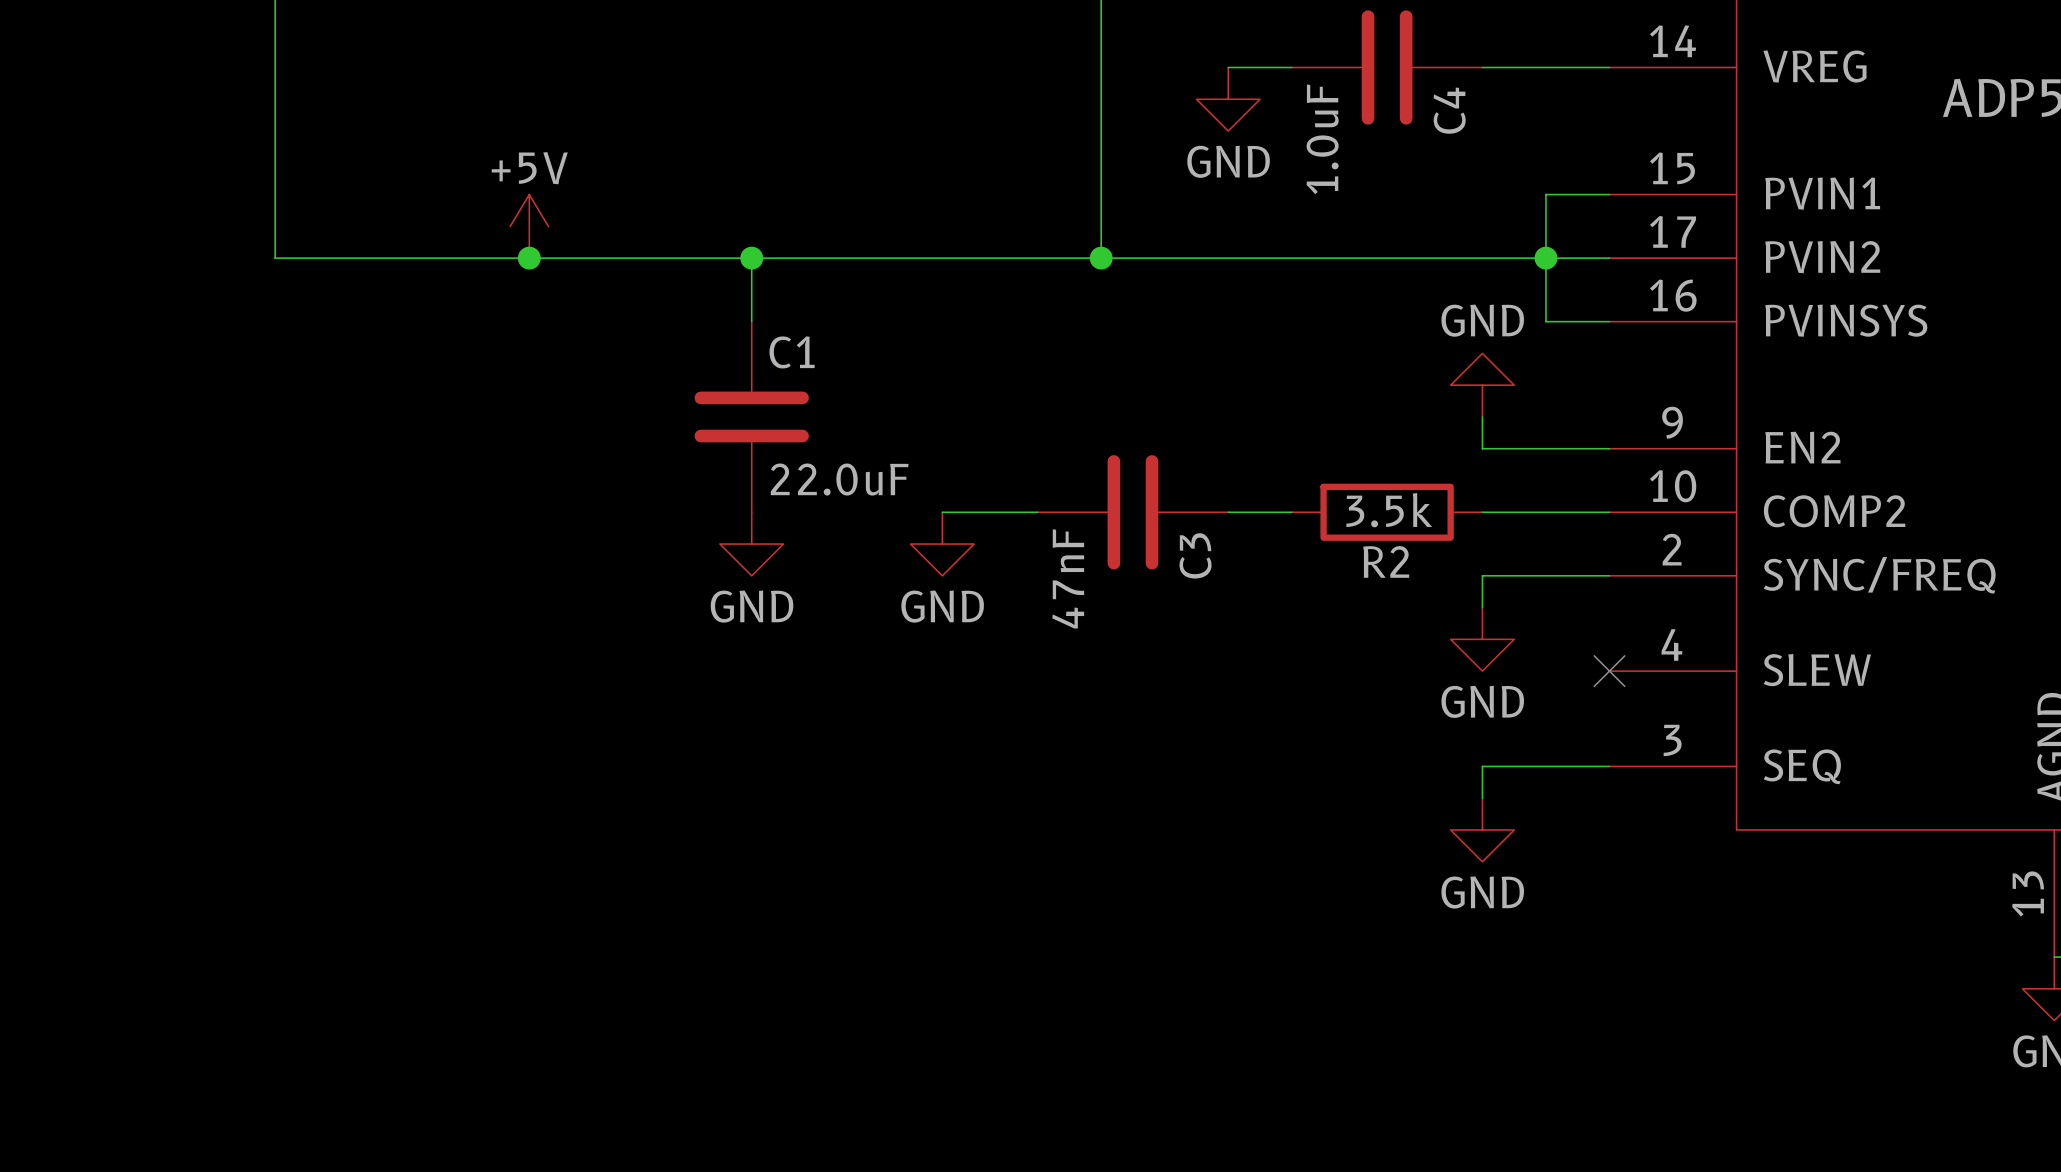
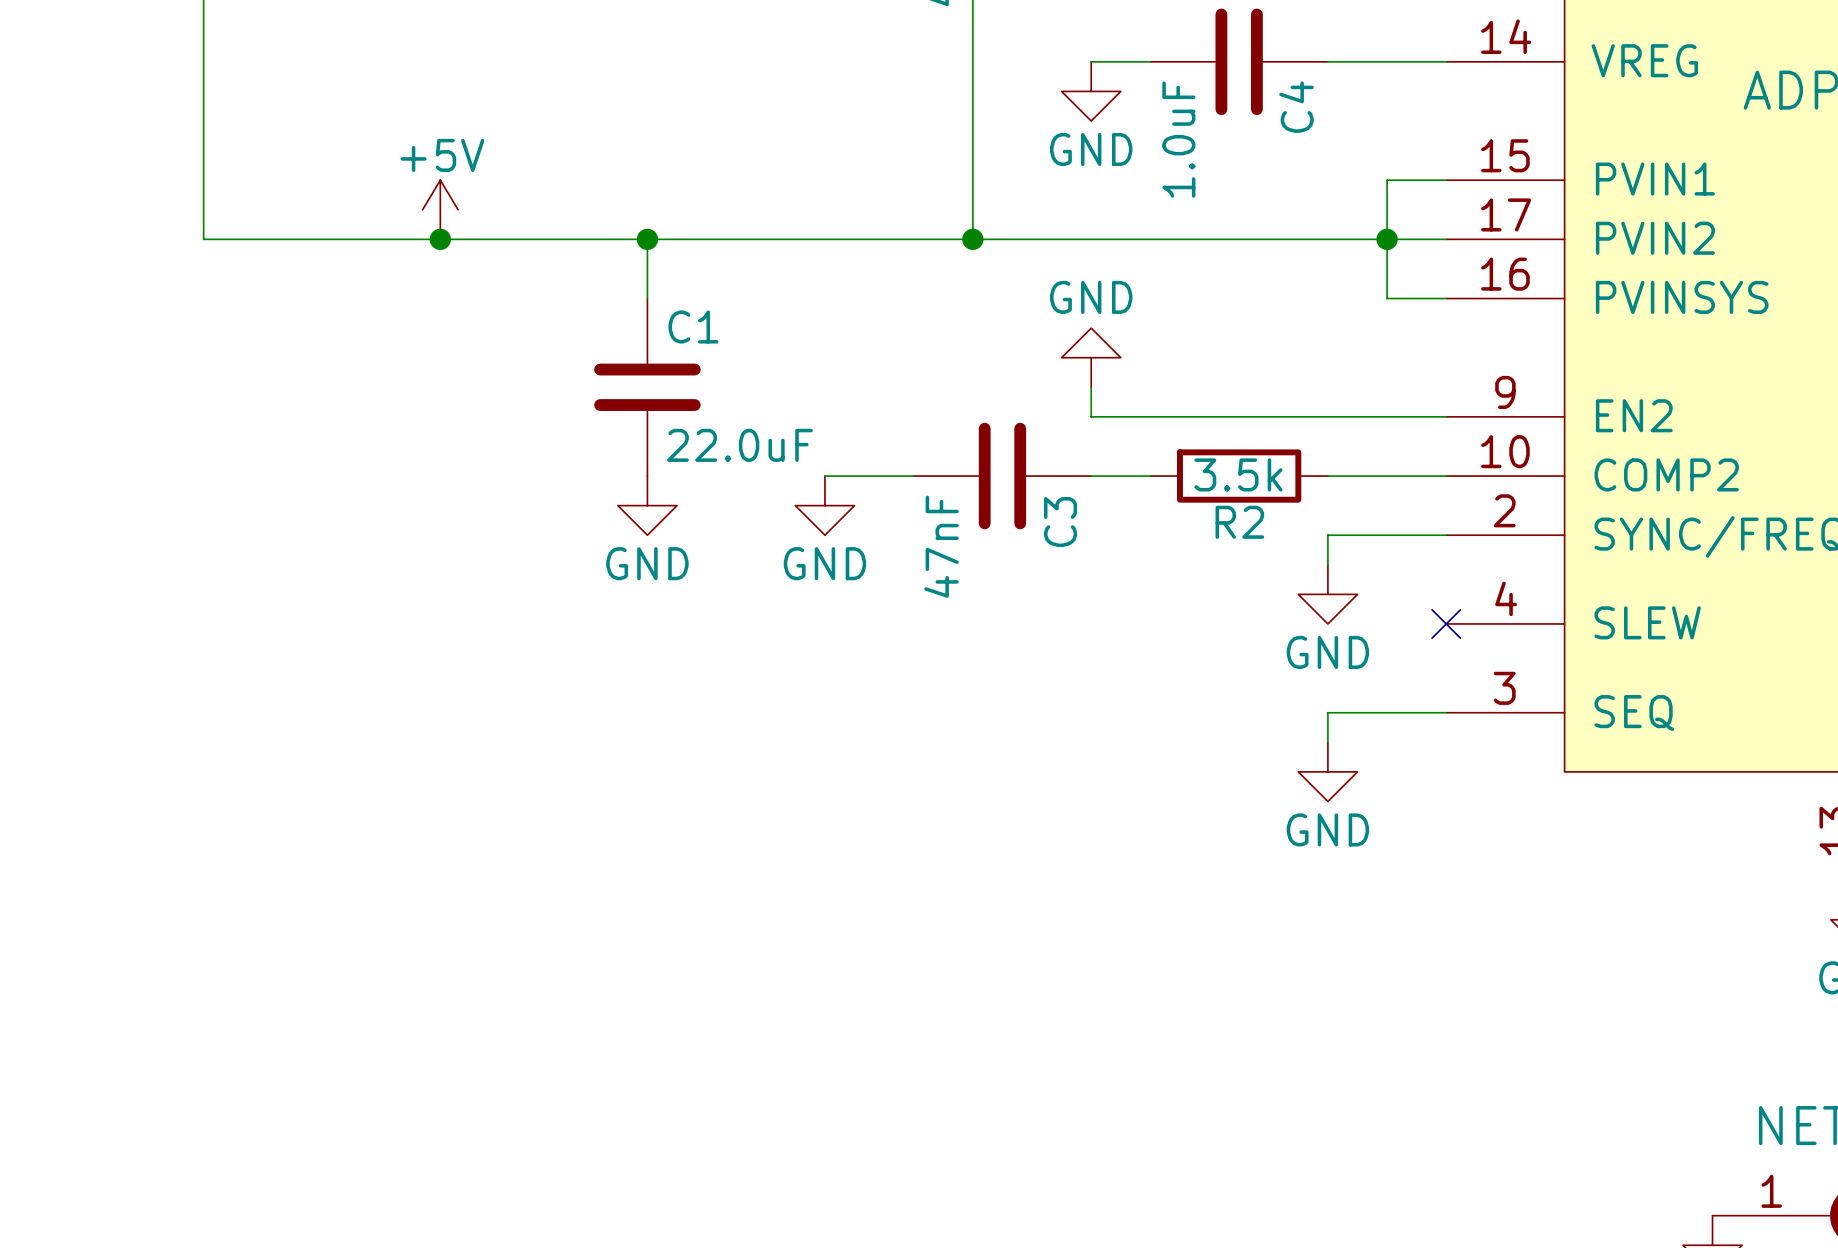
power symbol position: GND (1482, 385) -> GND (1091, 357)
wire: (1482, 416) (1482, 448) -> (1091, 387) (1091, 416) (1327, 416)

